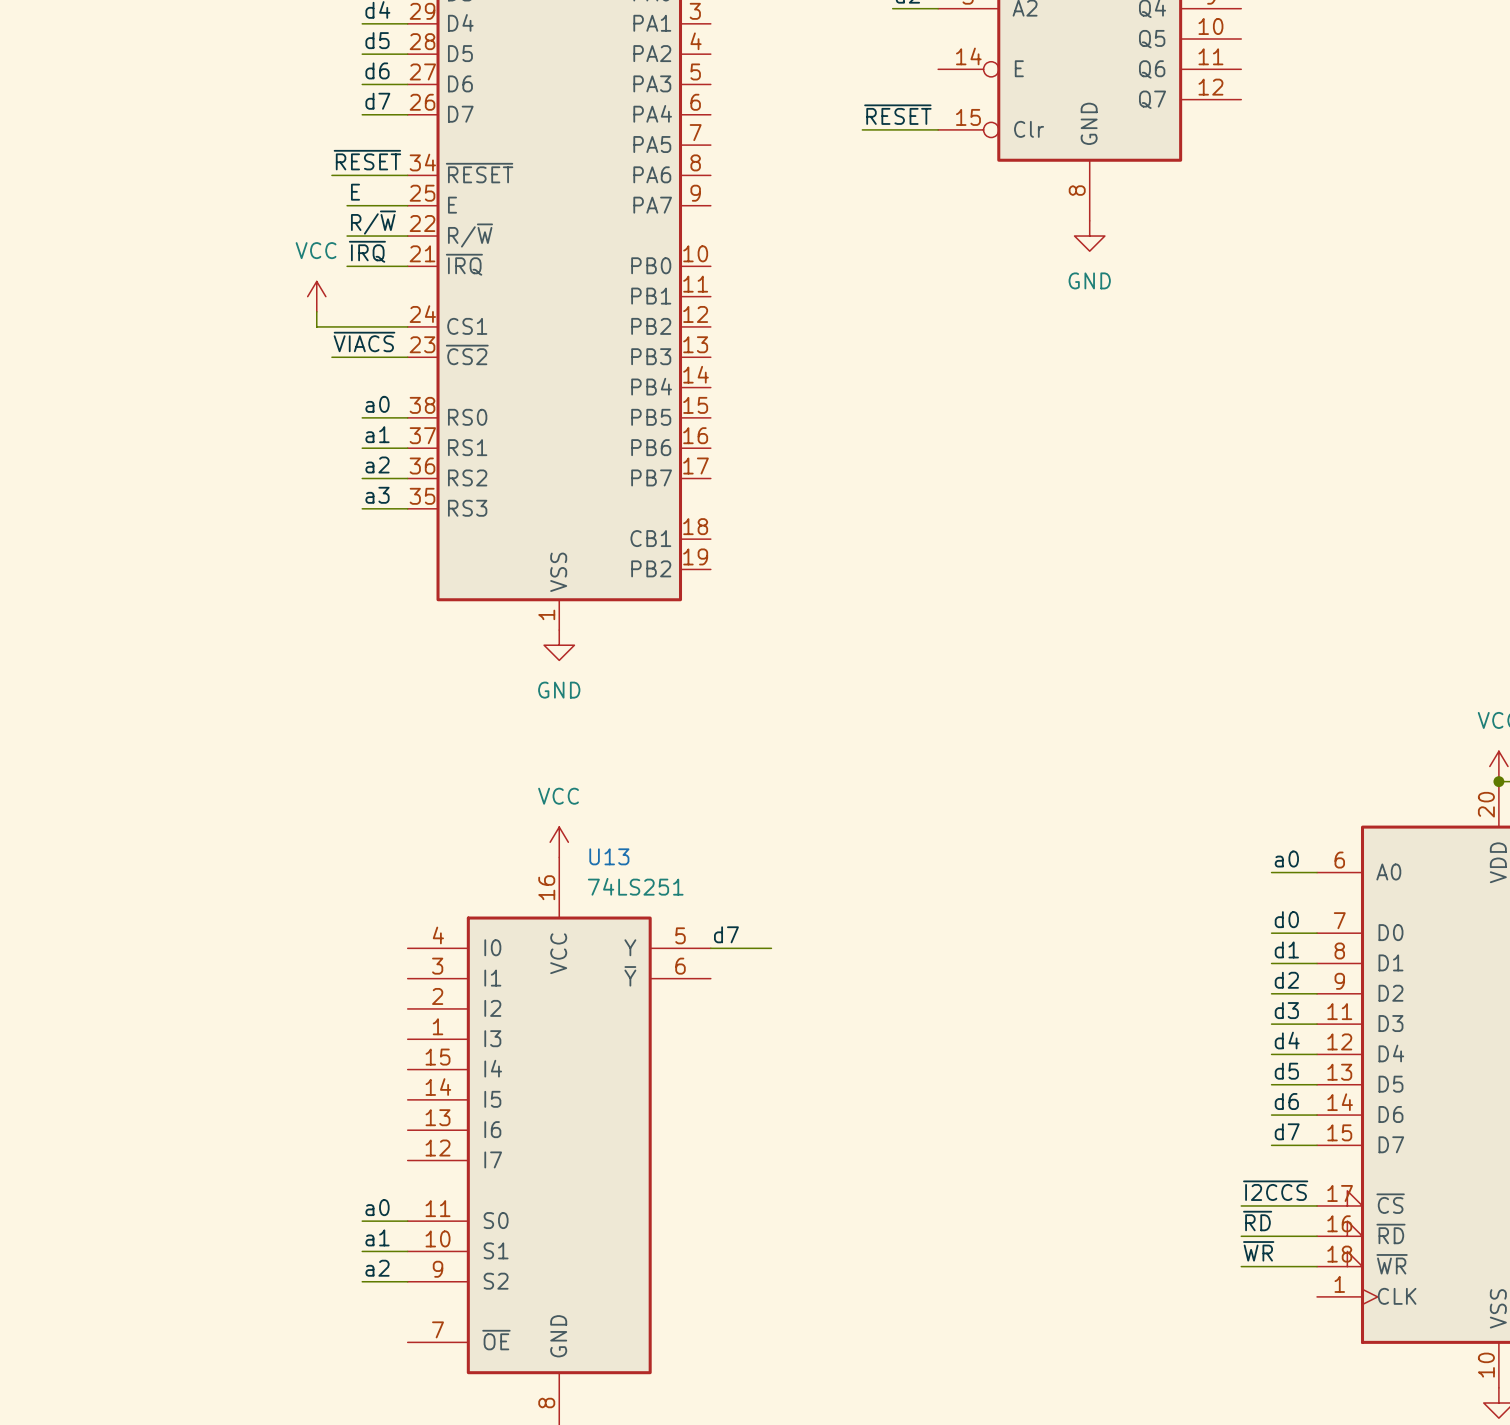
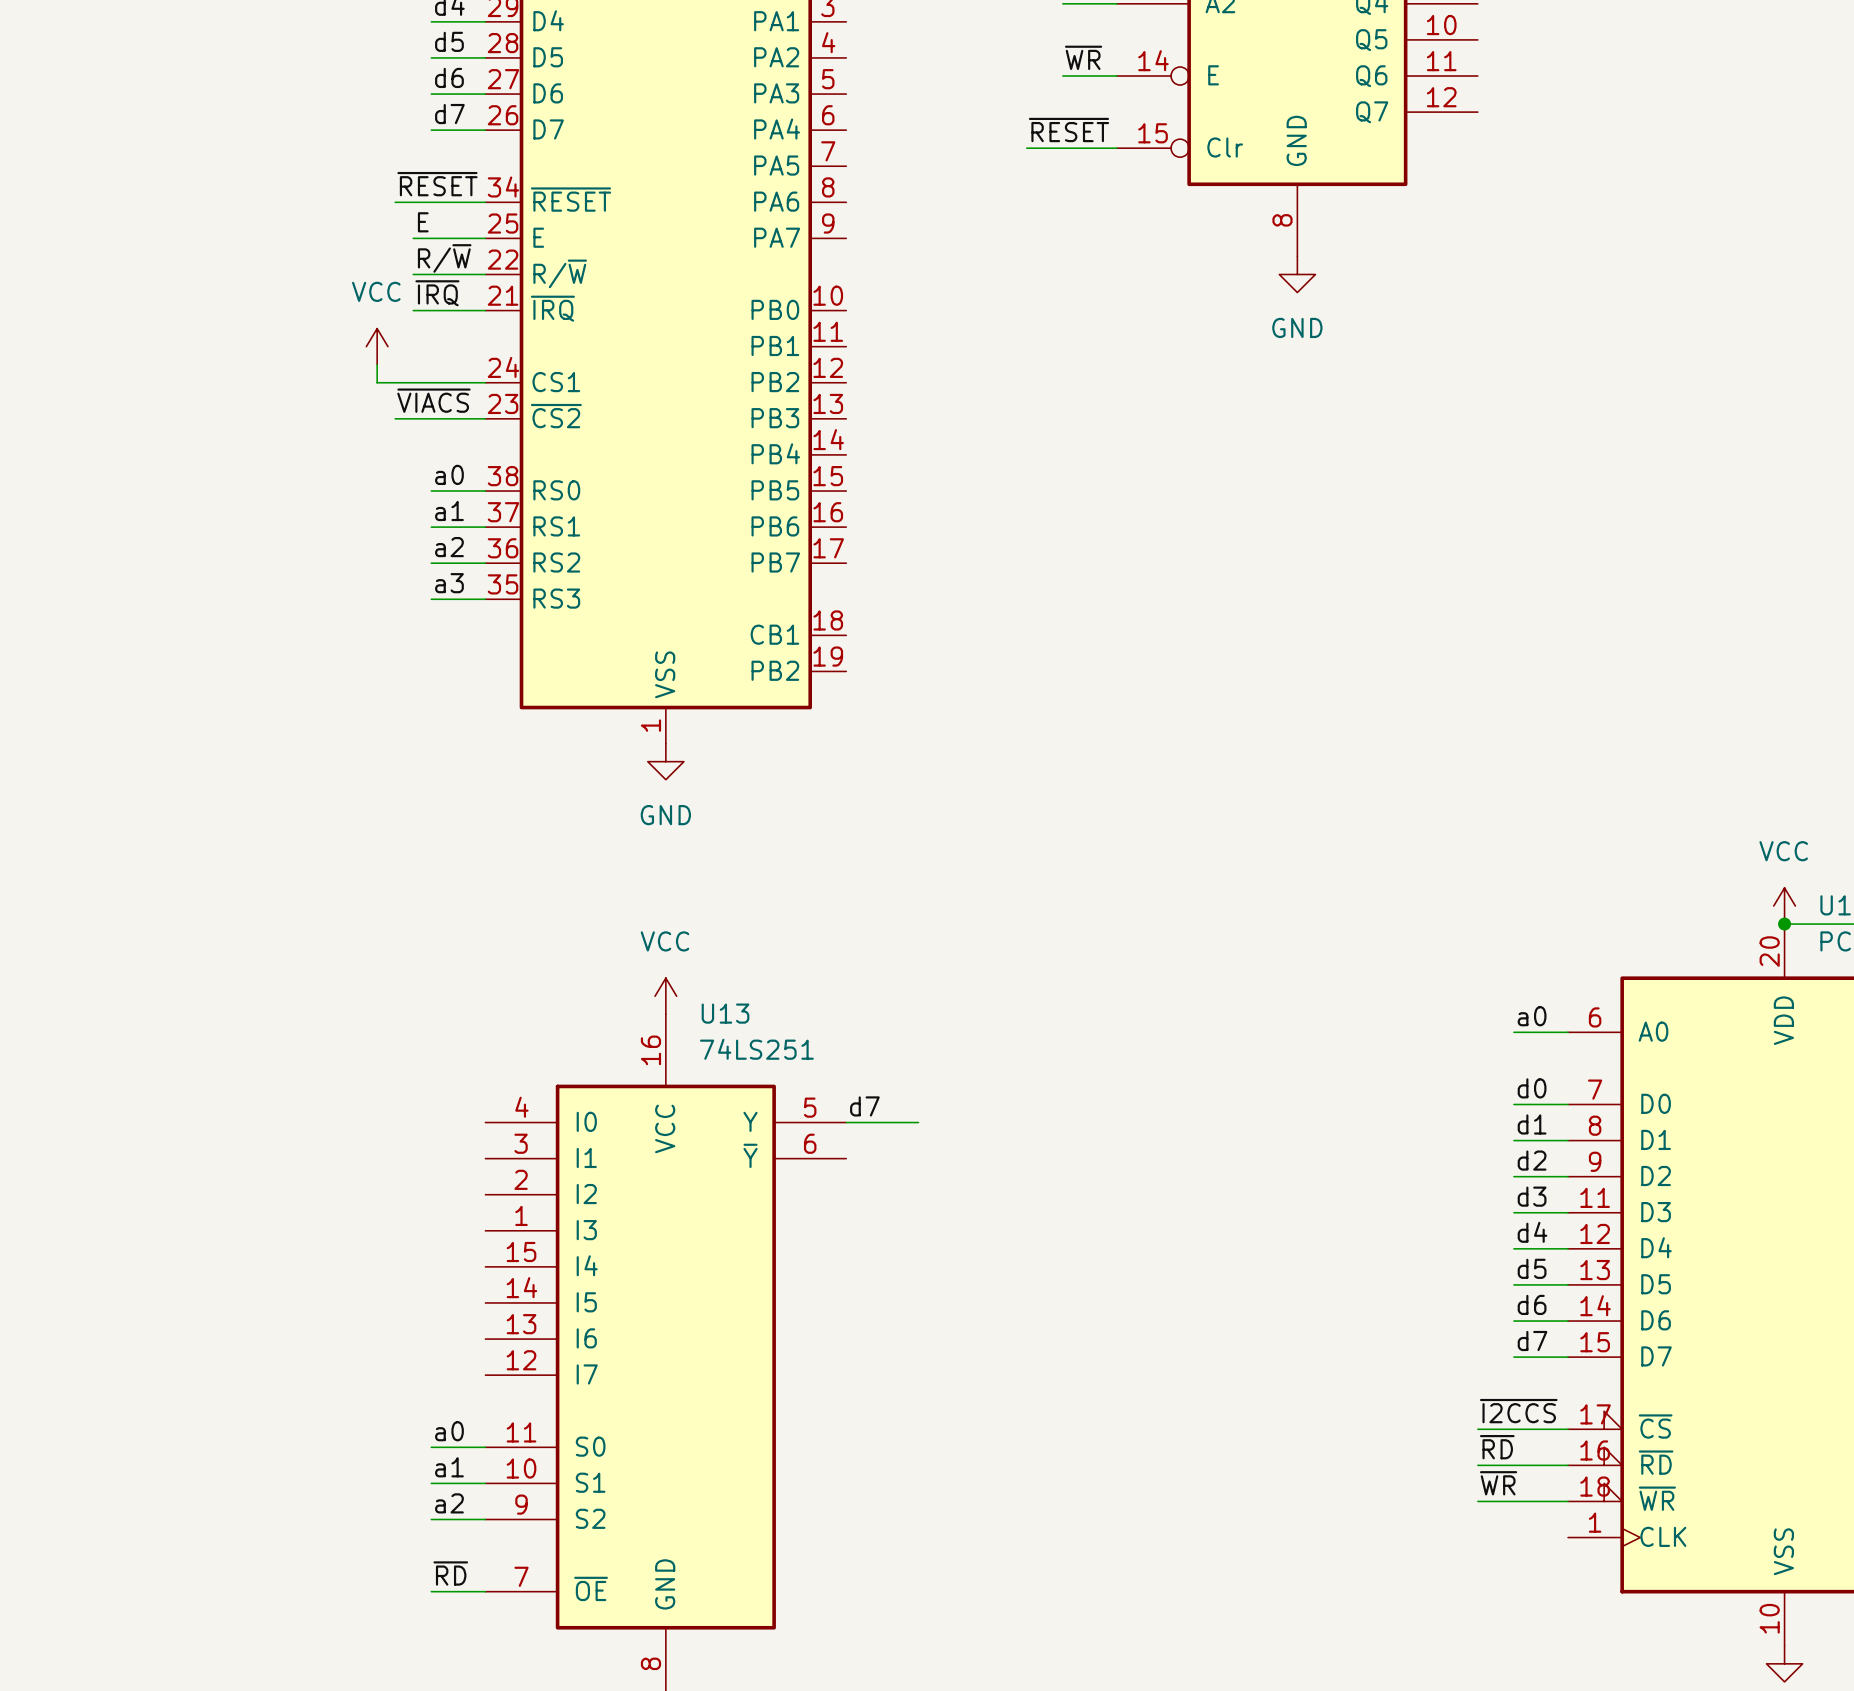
label: none -> ~{WR} (1083, 57)
wire: none -> (1062, 76) (1116, 76)
label: none -> ~{RD} (450, 1573)
wire: none -> (431, 1591) (485, 1591)

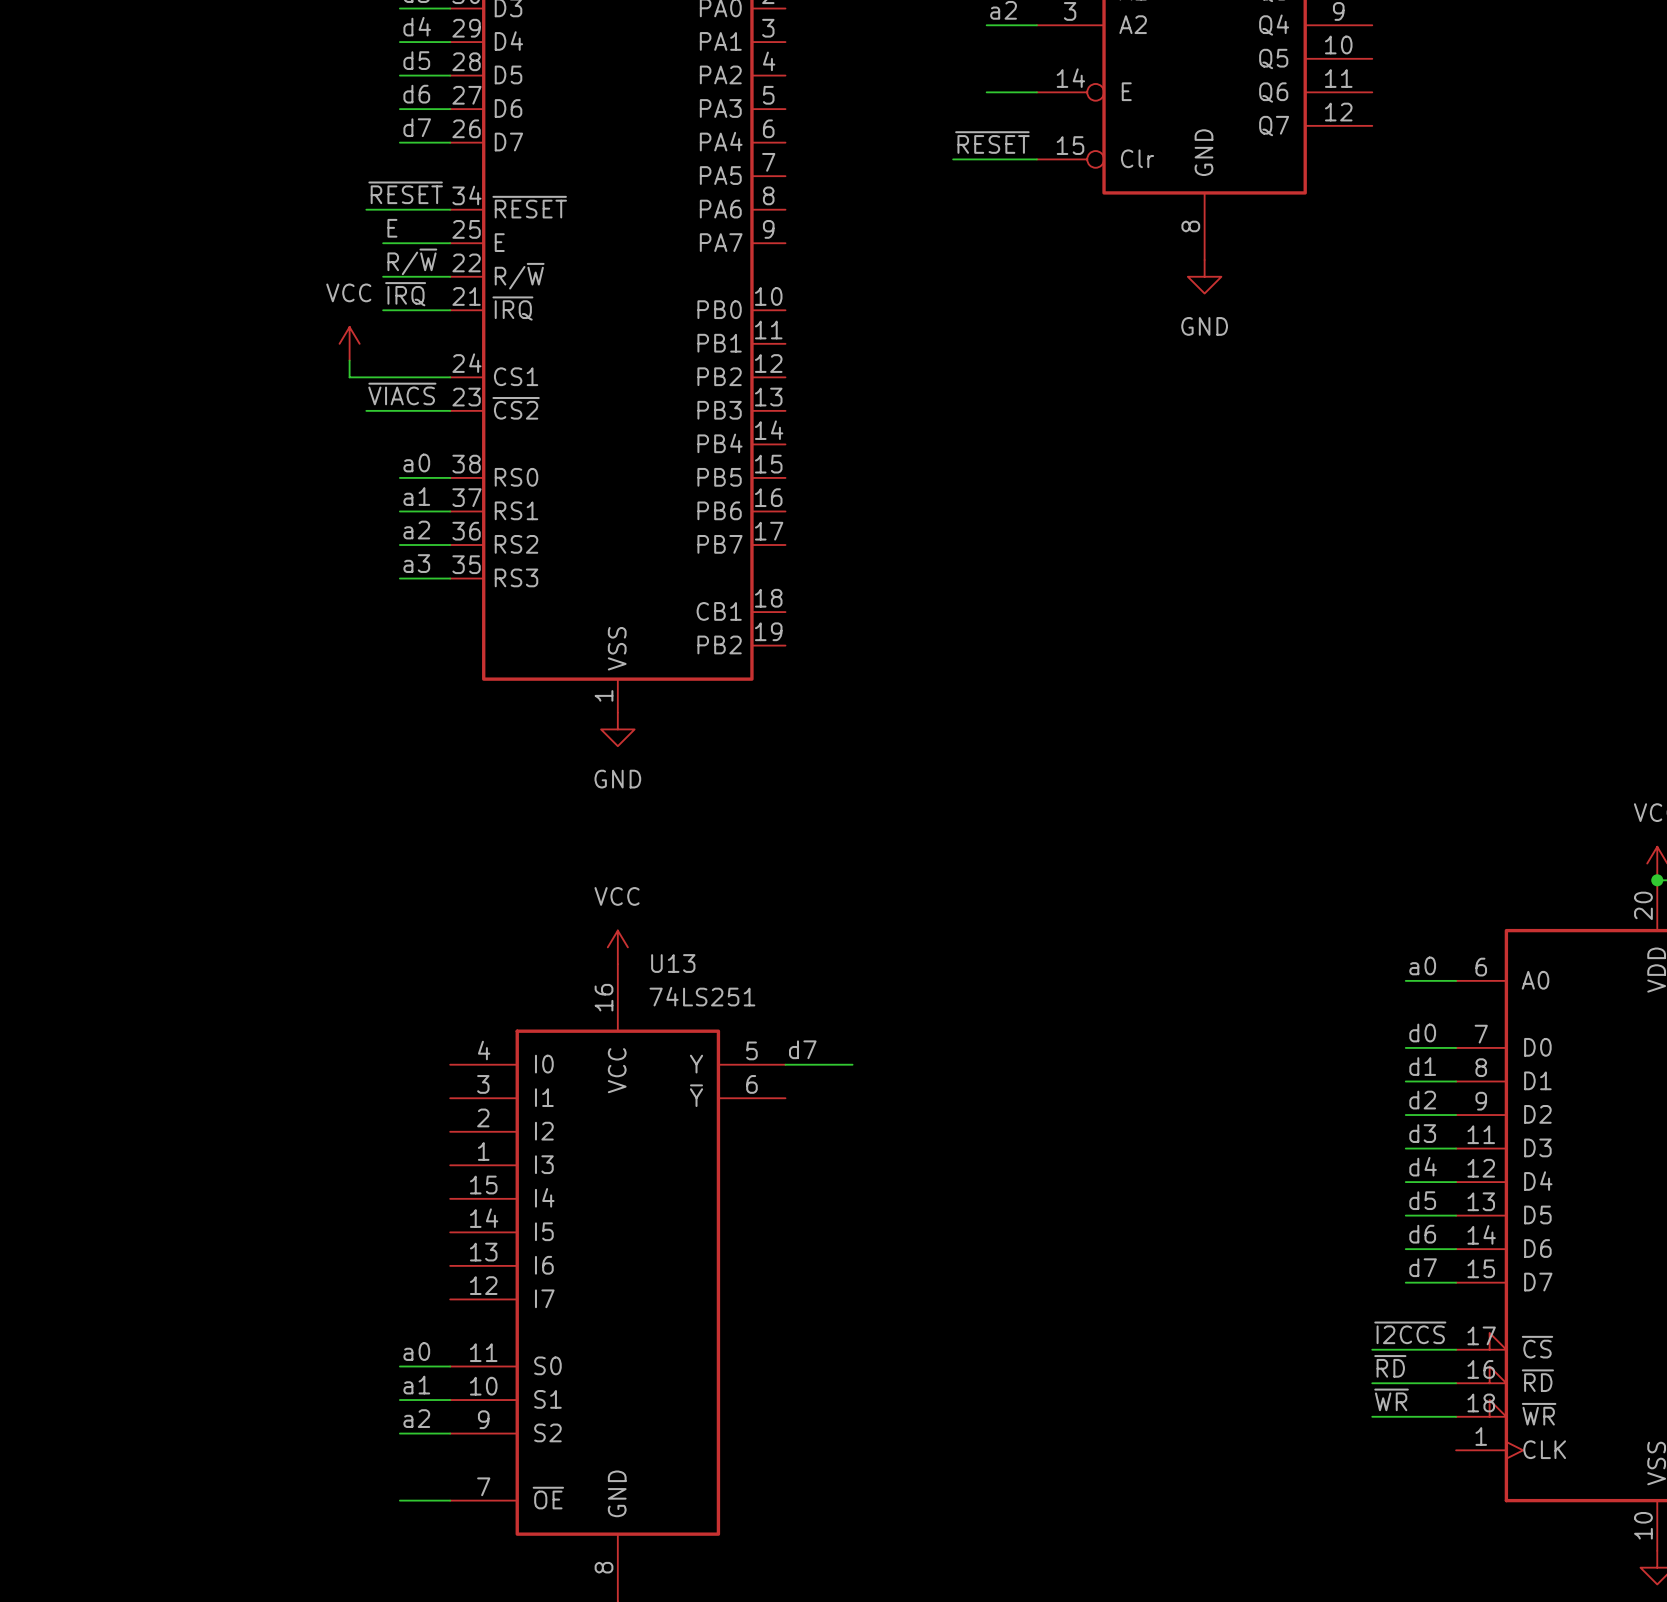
label: ~{WR} (1083, 57) -> none
label: ~{RD} (450, 1573) -> none

